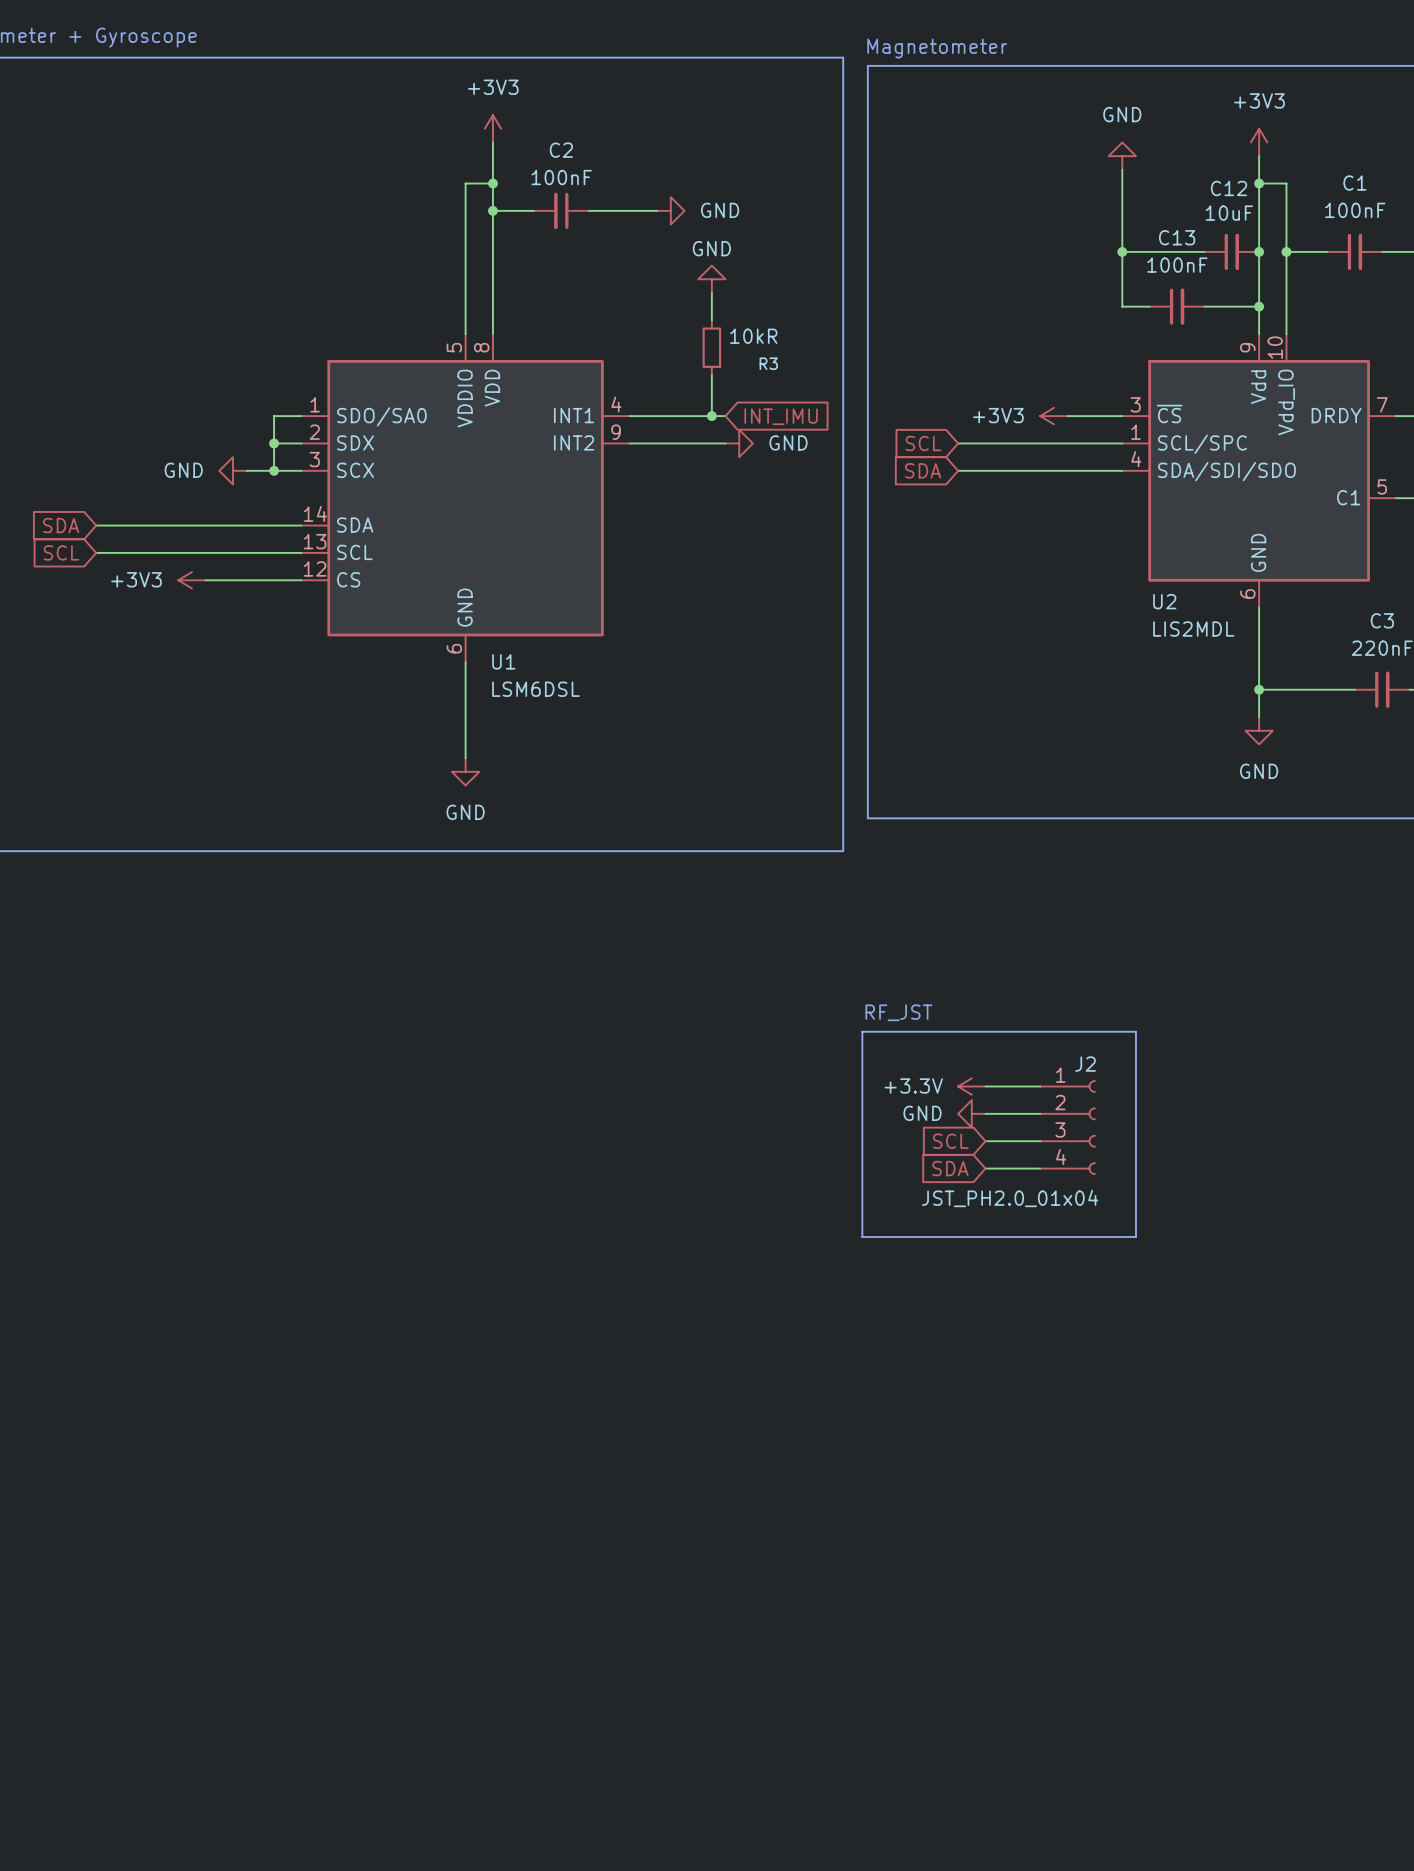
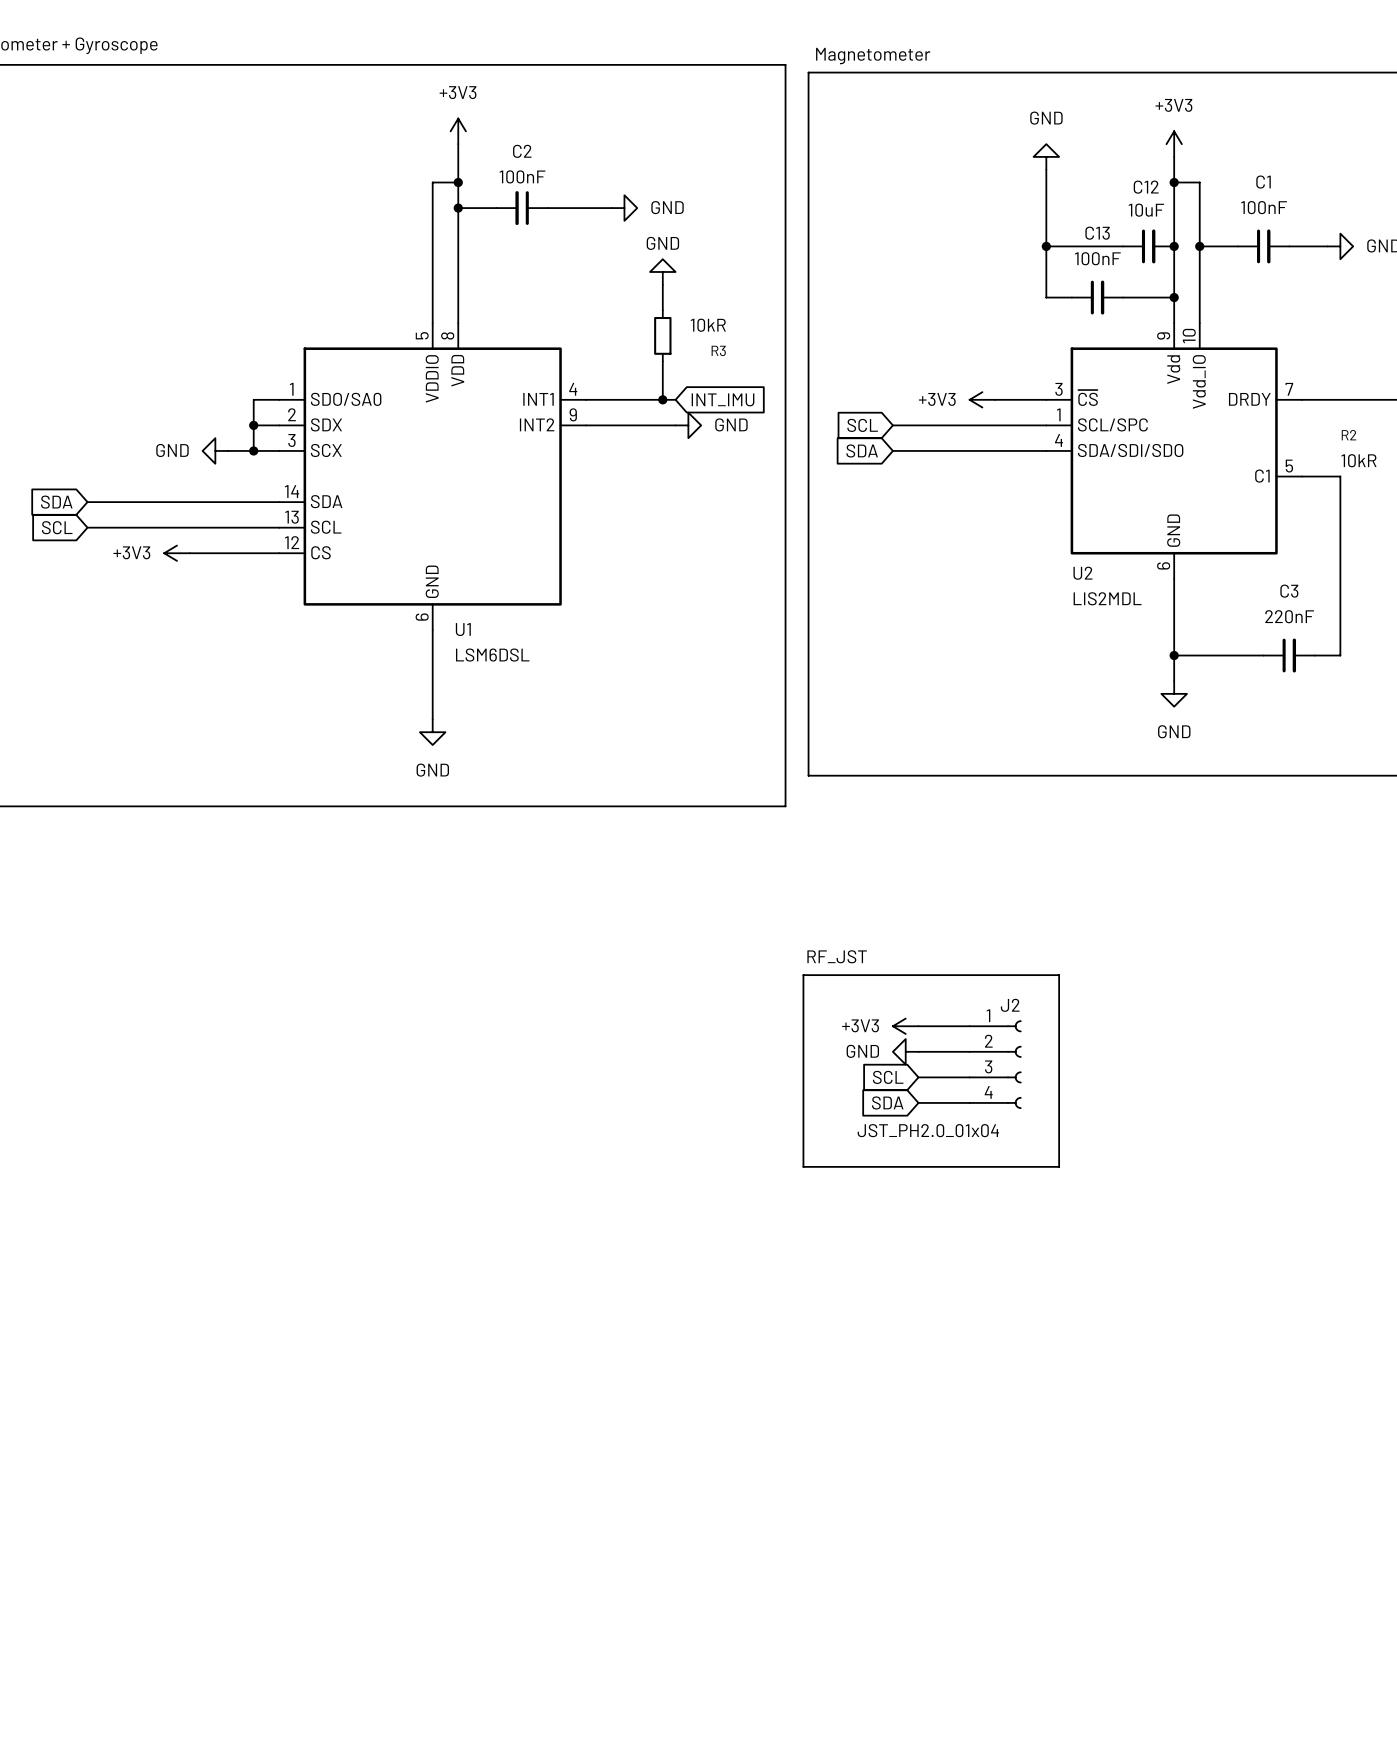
power symbol: +3.3V (971, 1086) -> +3V3 (905, 1026)

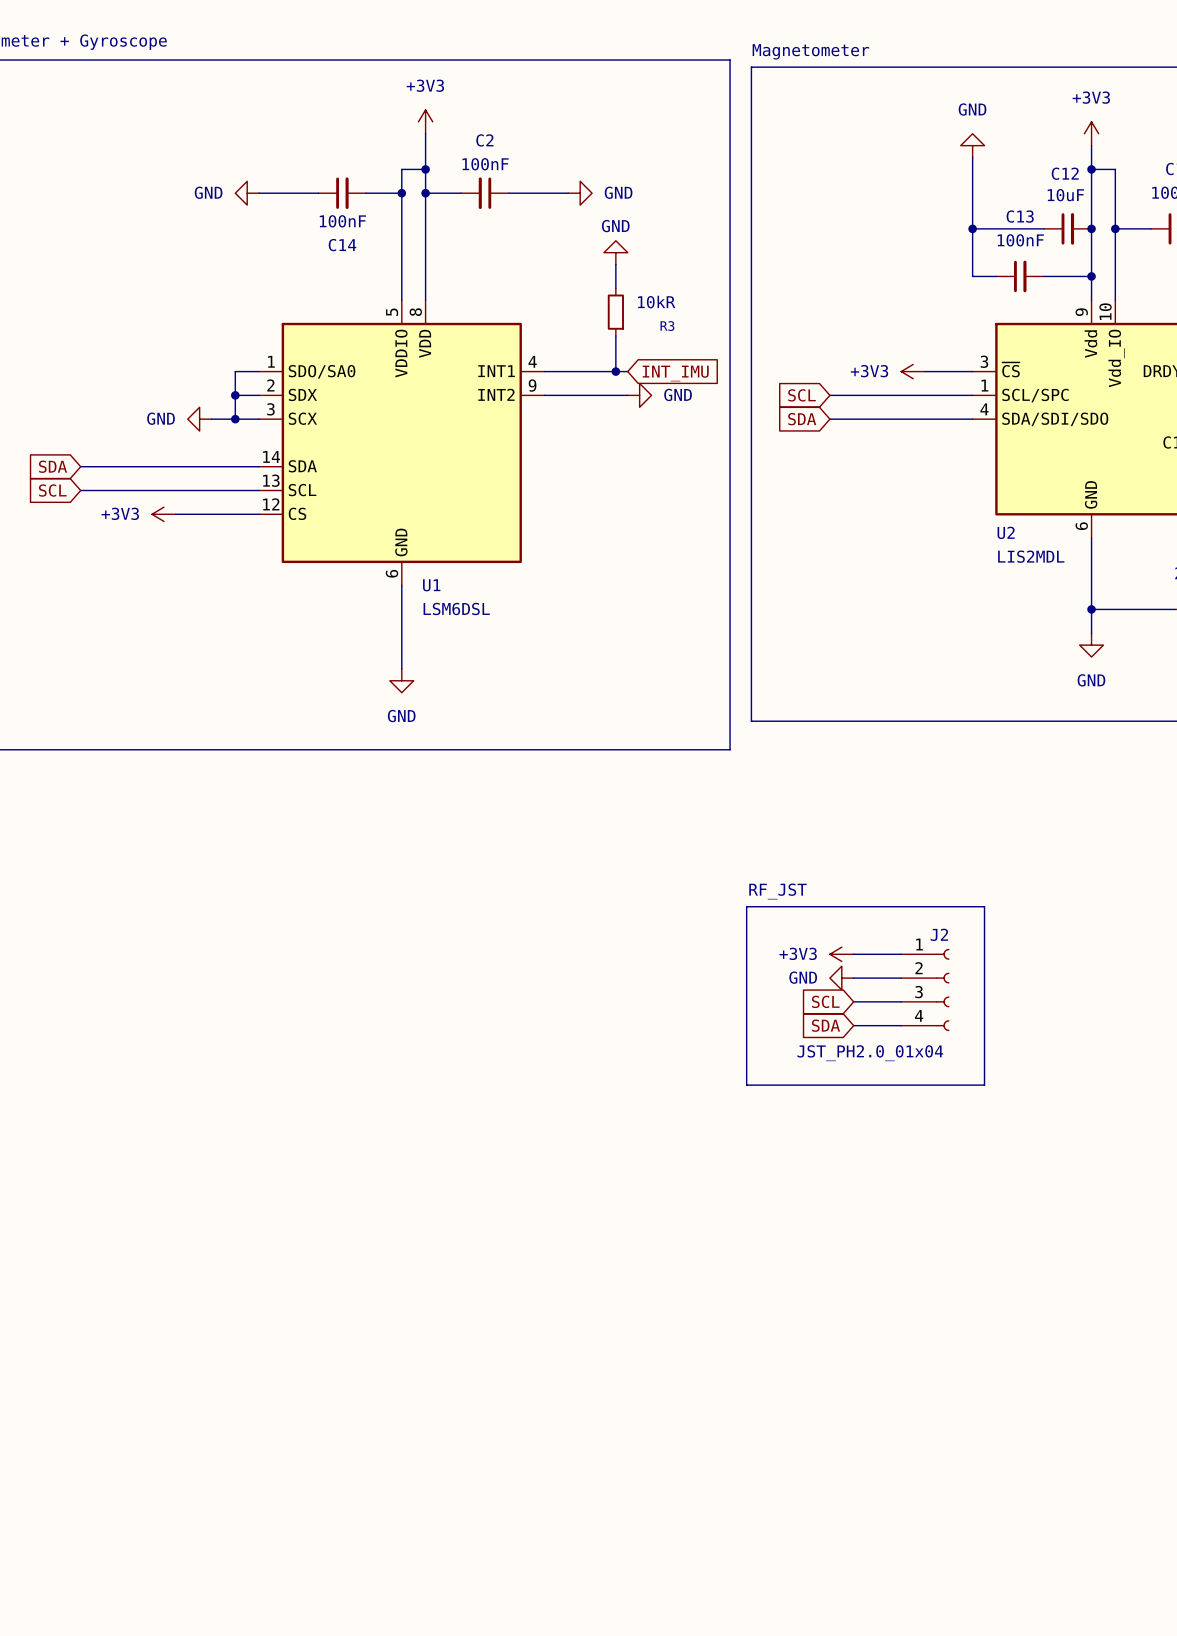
power symbol: none -> GND (247, 193)
wire: none -> (259, 193) (318, 193)
C14: none -> 100nF (342, 193)
wire: none -> (366, 193) (401, 193)
junction: none -> (401, 193)

